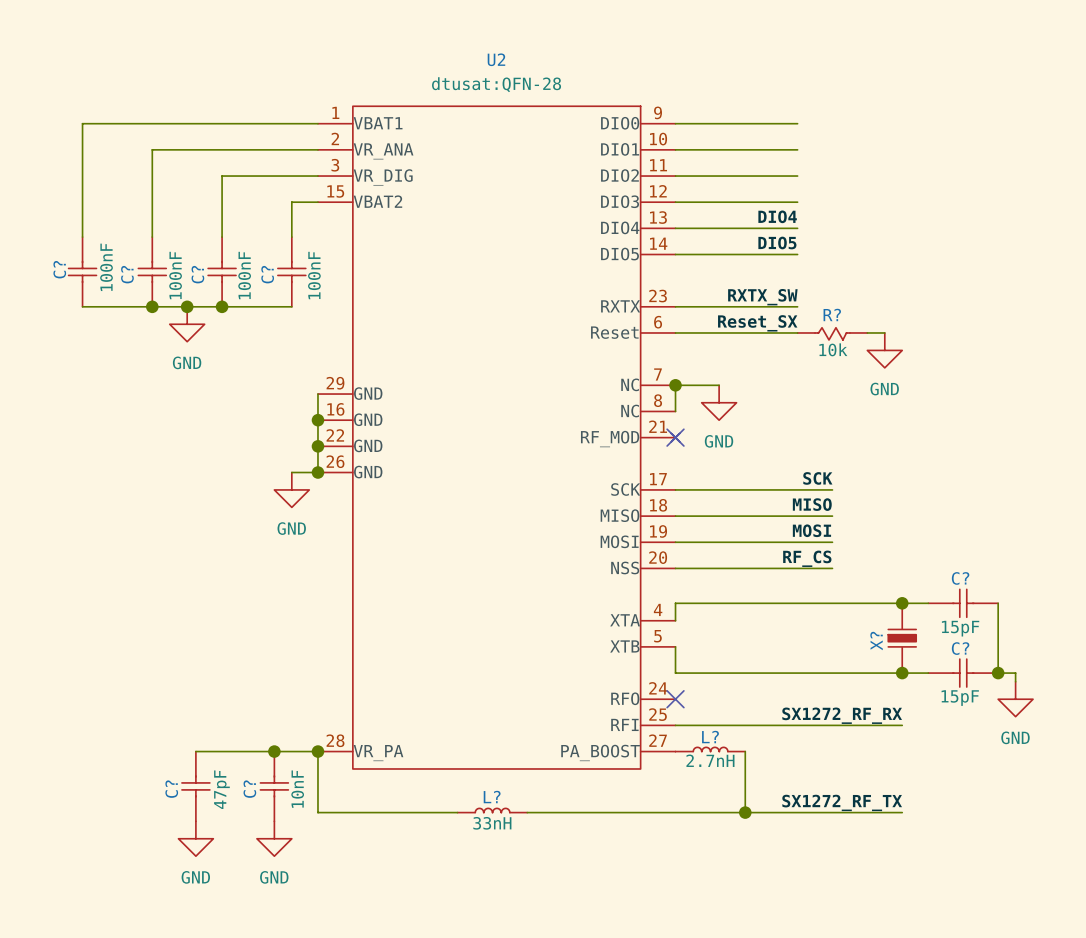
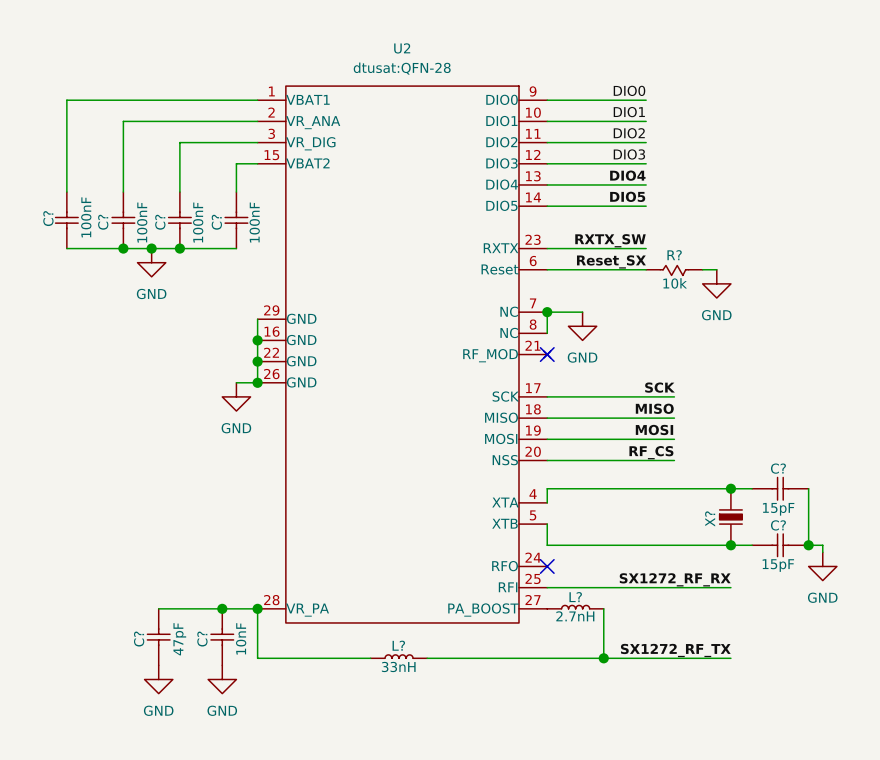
label: none -> DIO0 (629, 90)
label: none -> DIO1 (629, 112)
label: none -> DIO2 (629, 133)
label: none -> DIO3 (629, 154)

